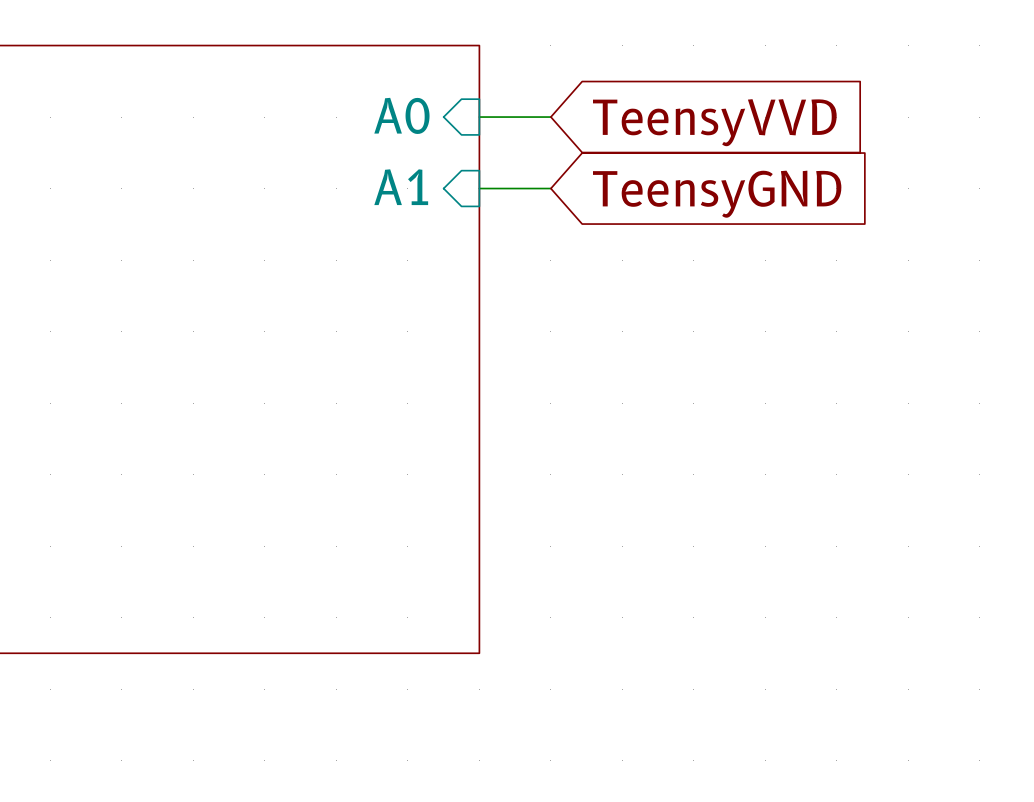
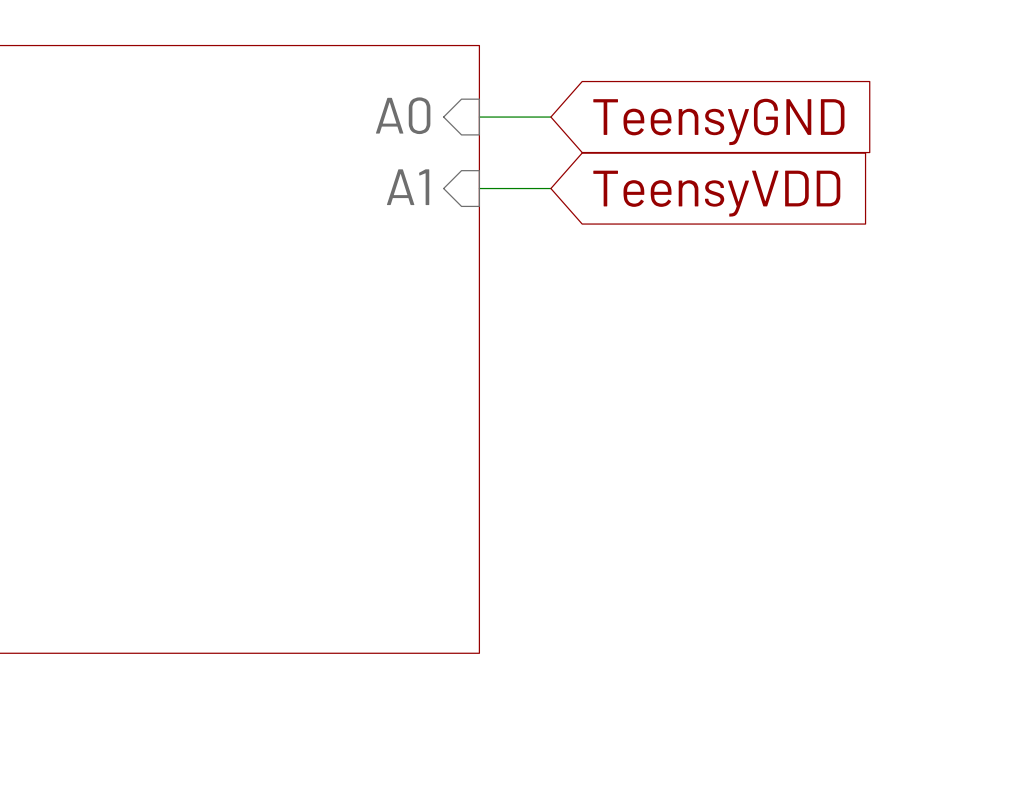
global label: TeensyVVD (714, 122) -> TeensyGND (718, 121)
global label: TeensyGND (717, 194) -> TeensyVDD (716, 193)

